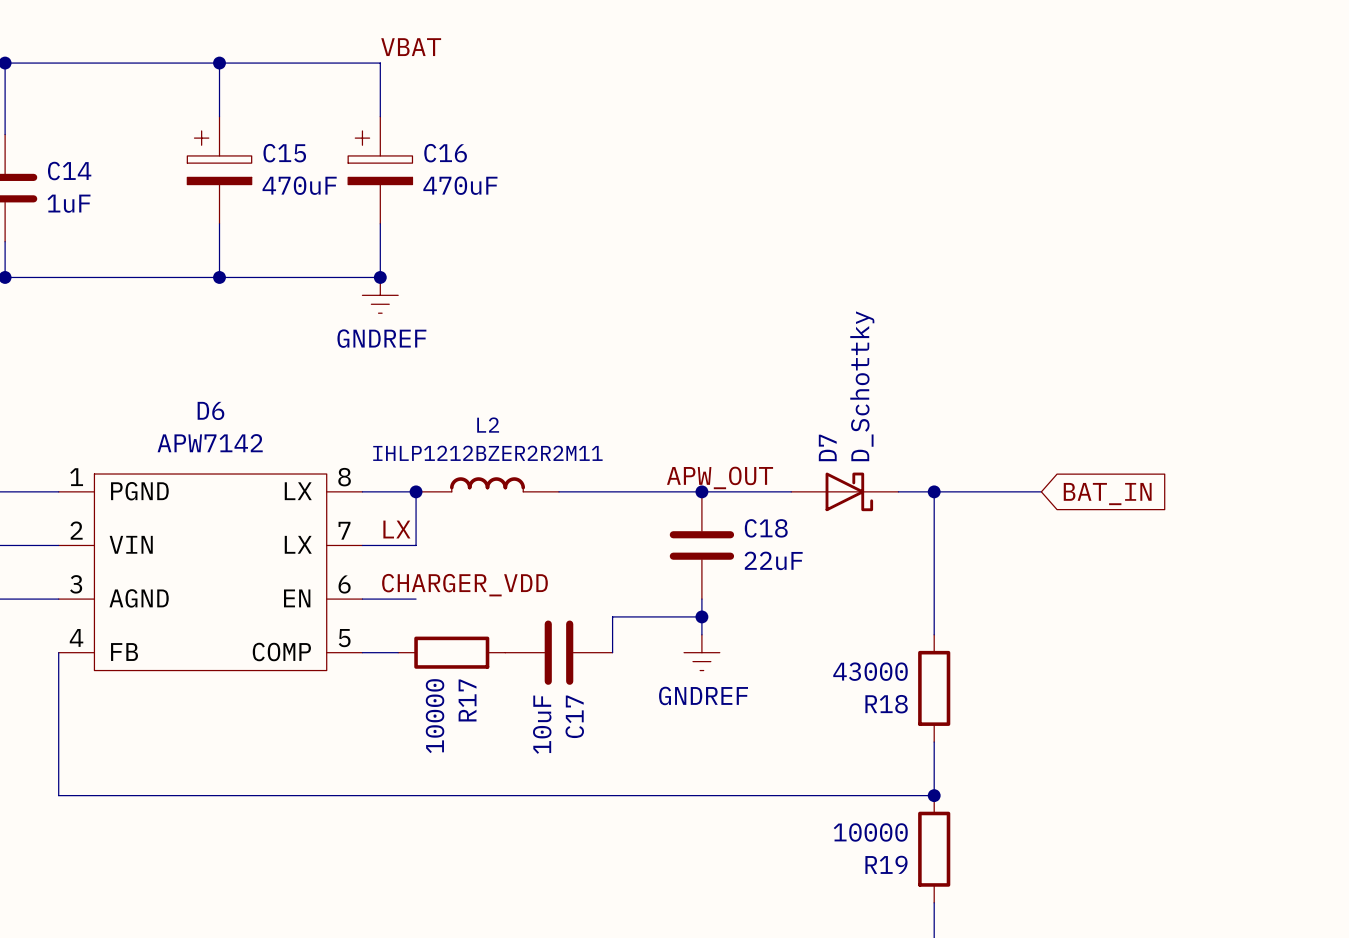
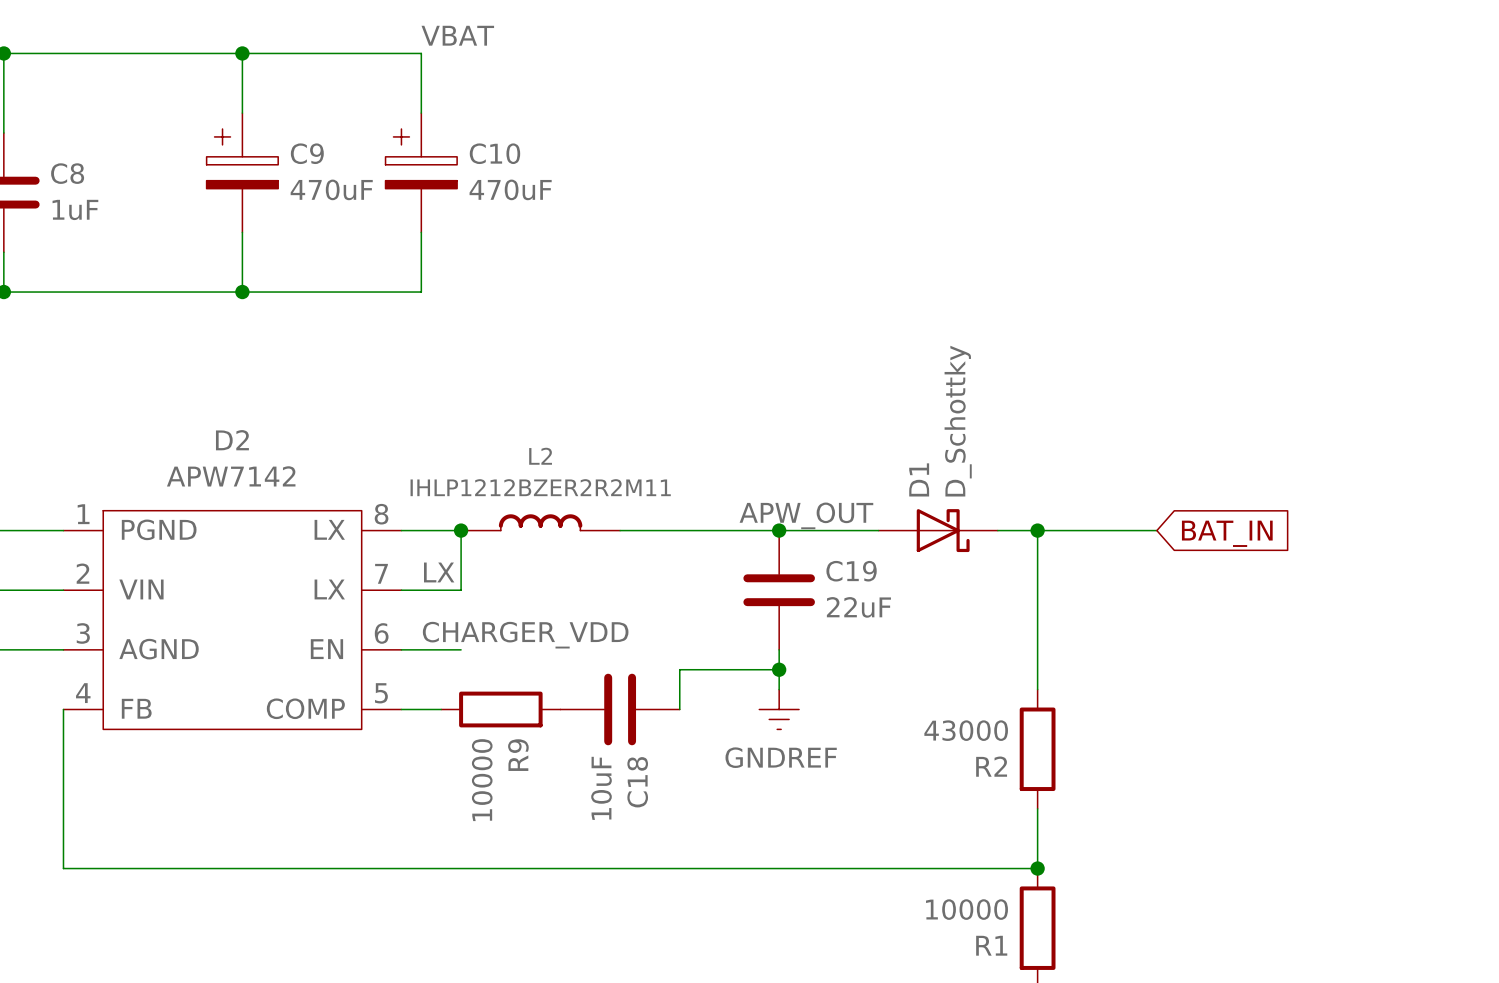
C15 name: C15 (284, 153) -> C9 (307, 153)
C16 name: C16 (445, 153) -> C10 (494, 153)
C14 name: C14 (69, 171) -> C8 (67, 173)
junction: (380, 277) -> none
power symbol: GNDREF (380, 295) -> none
D6 name: D6 (210, 410) -> D2 (232, 440)
D7 name: D7 (827, 447) -> D1 (919, 479)
C18 name: C18 (766, 528) -> C19 (851, 571)
R17 name: R17 (467, 700) -> R9 (518, 755)
R18 name: R18 (886, 704) -> R2 (991, 766)
C17 name: C17 (574, 716) -> C18 (637, 782)
R19 name: R19 (886, 864) -> R1 (991, 945)

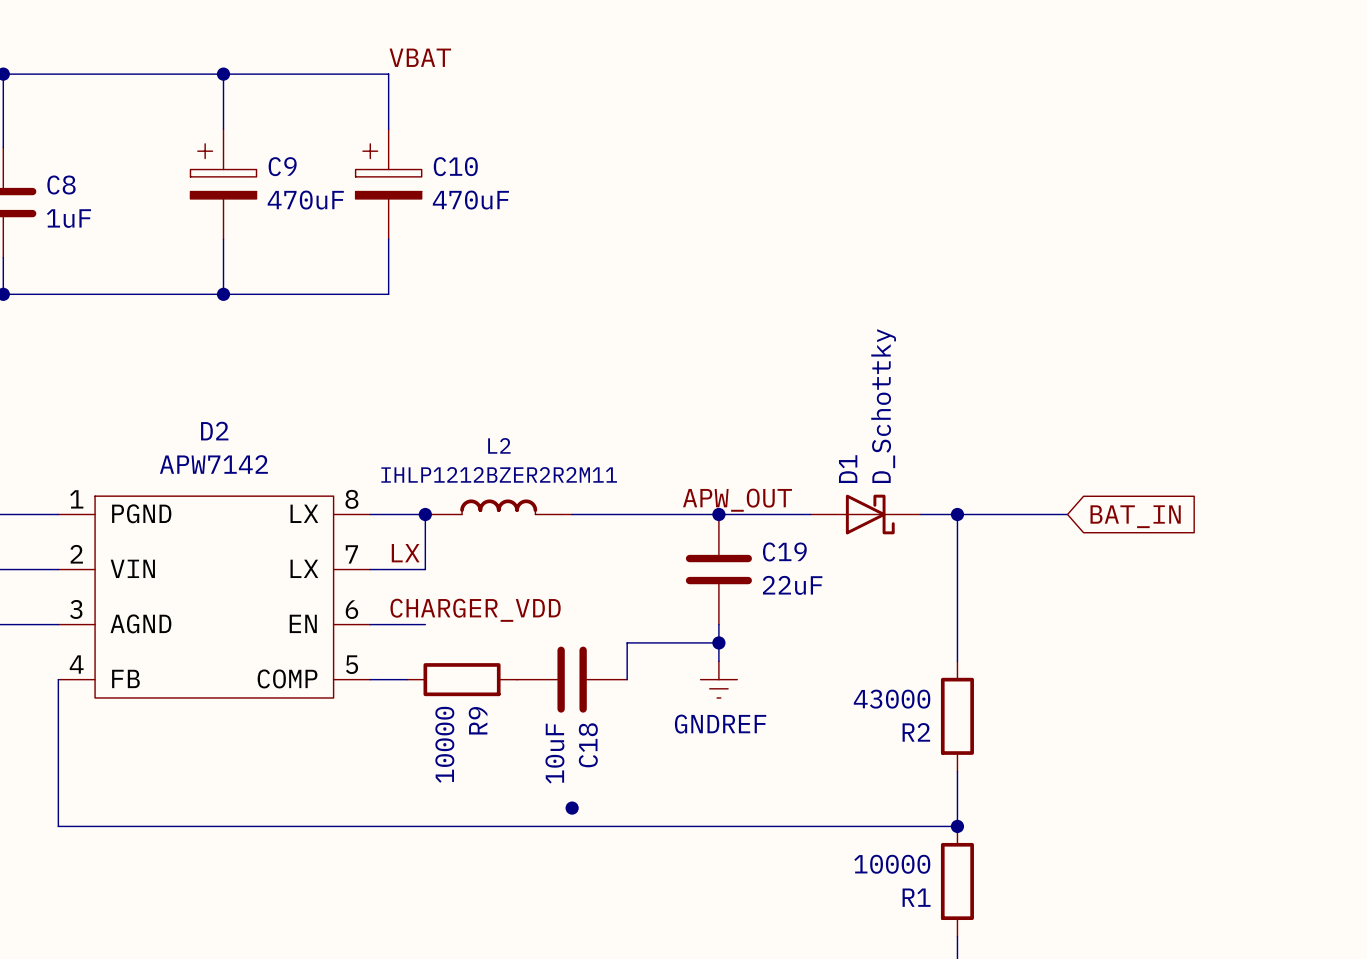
junction: none -> (572, 808)

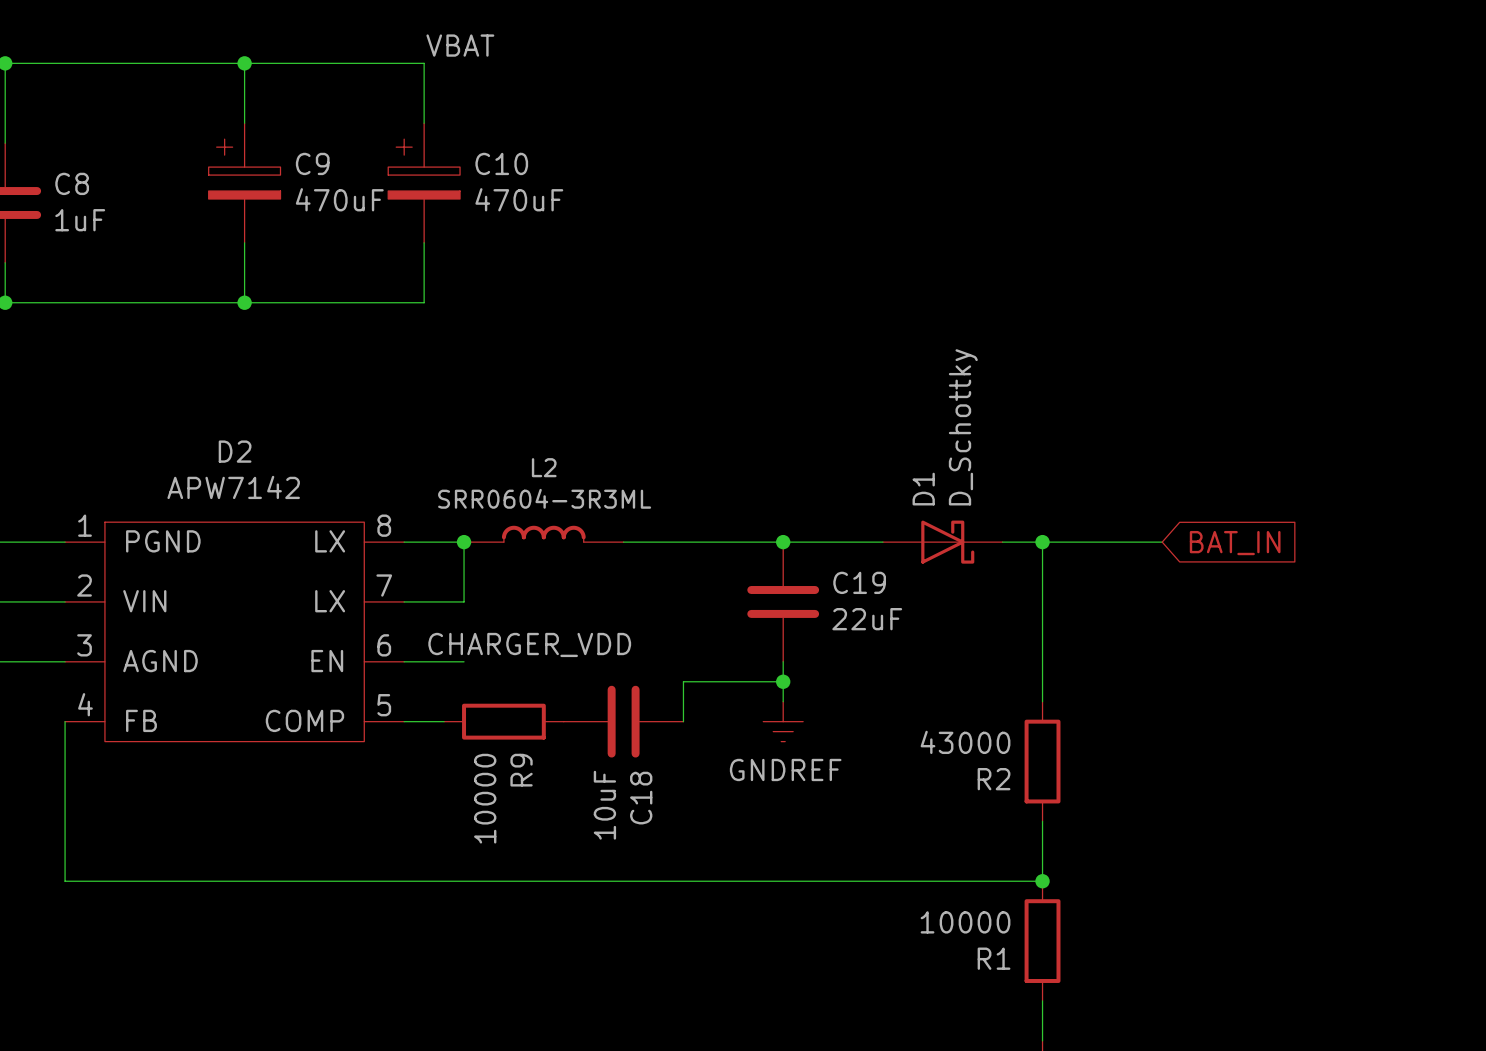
L2 value: IHLP1212BZER2R2M11 (499, 474) -> SRR0604-3R3ML (544, 498)
label: APW_OUT (737, 500) -> none
label: LX (405, 553) -> none
junction: (572, 808) -> none

